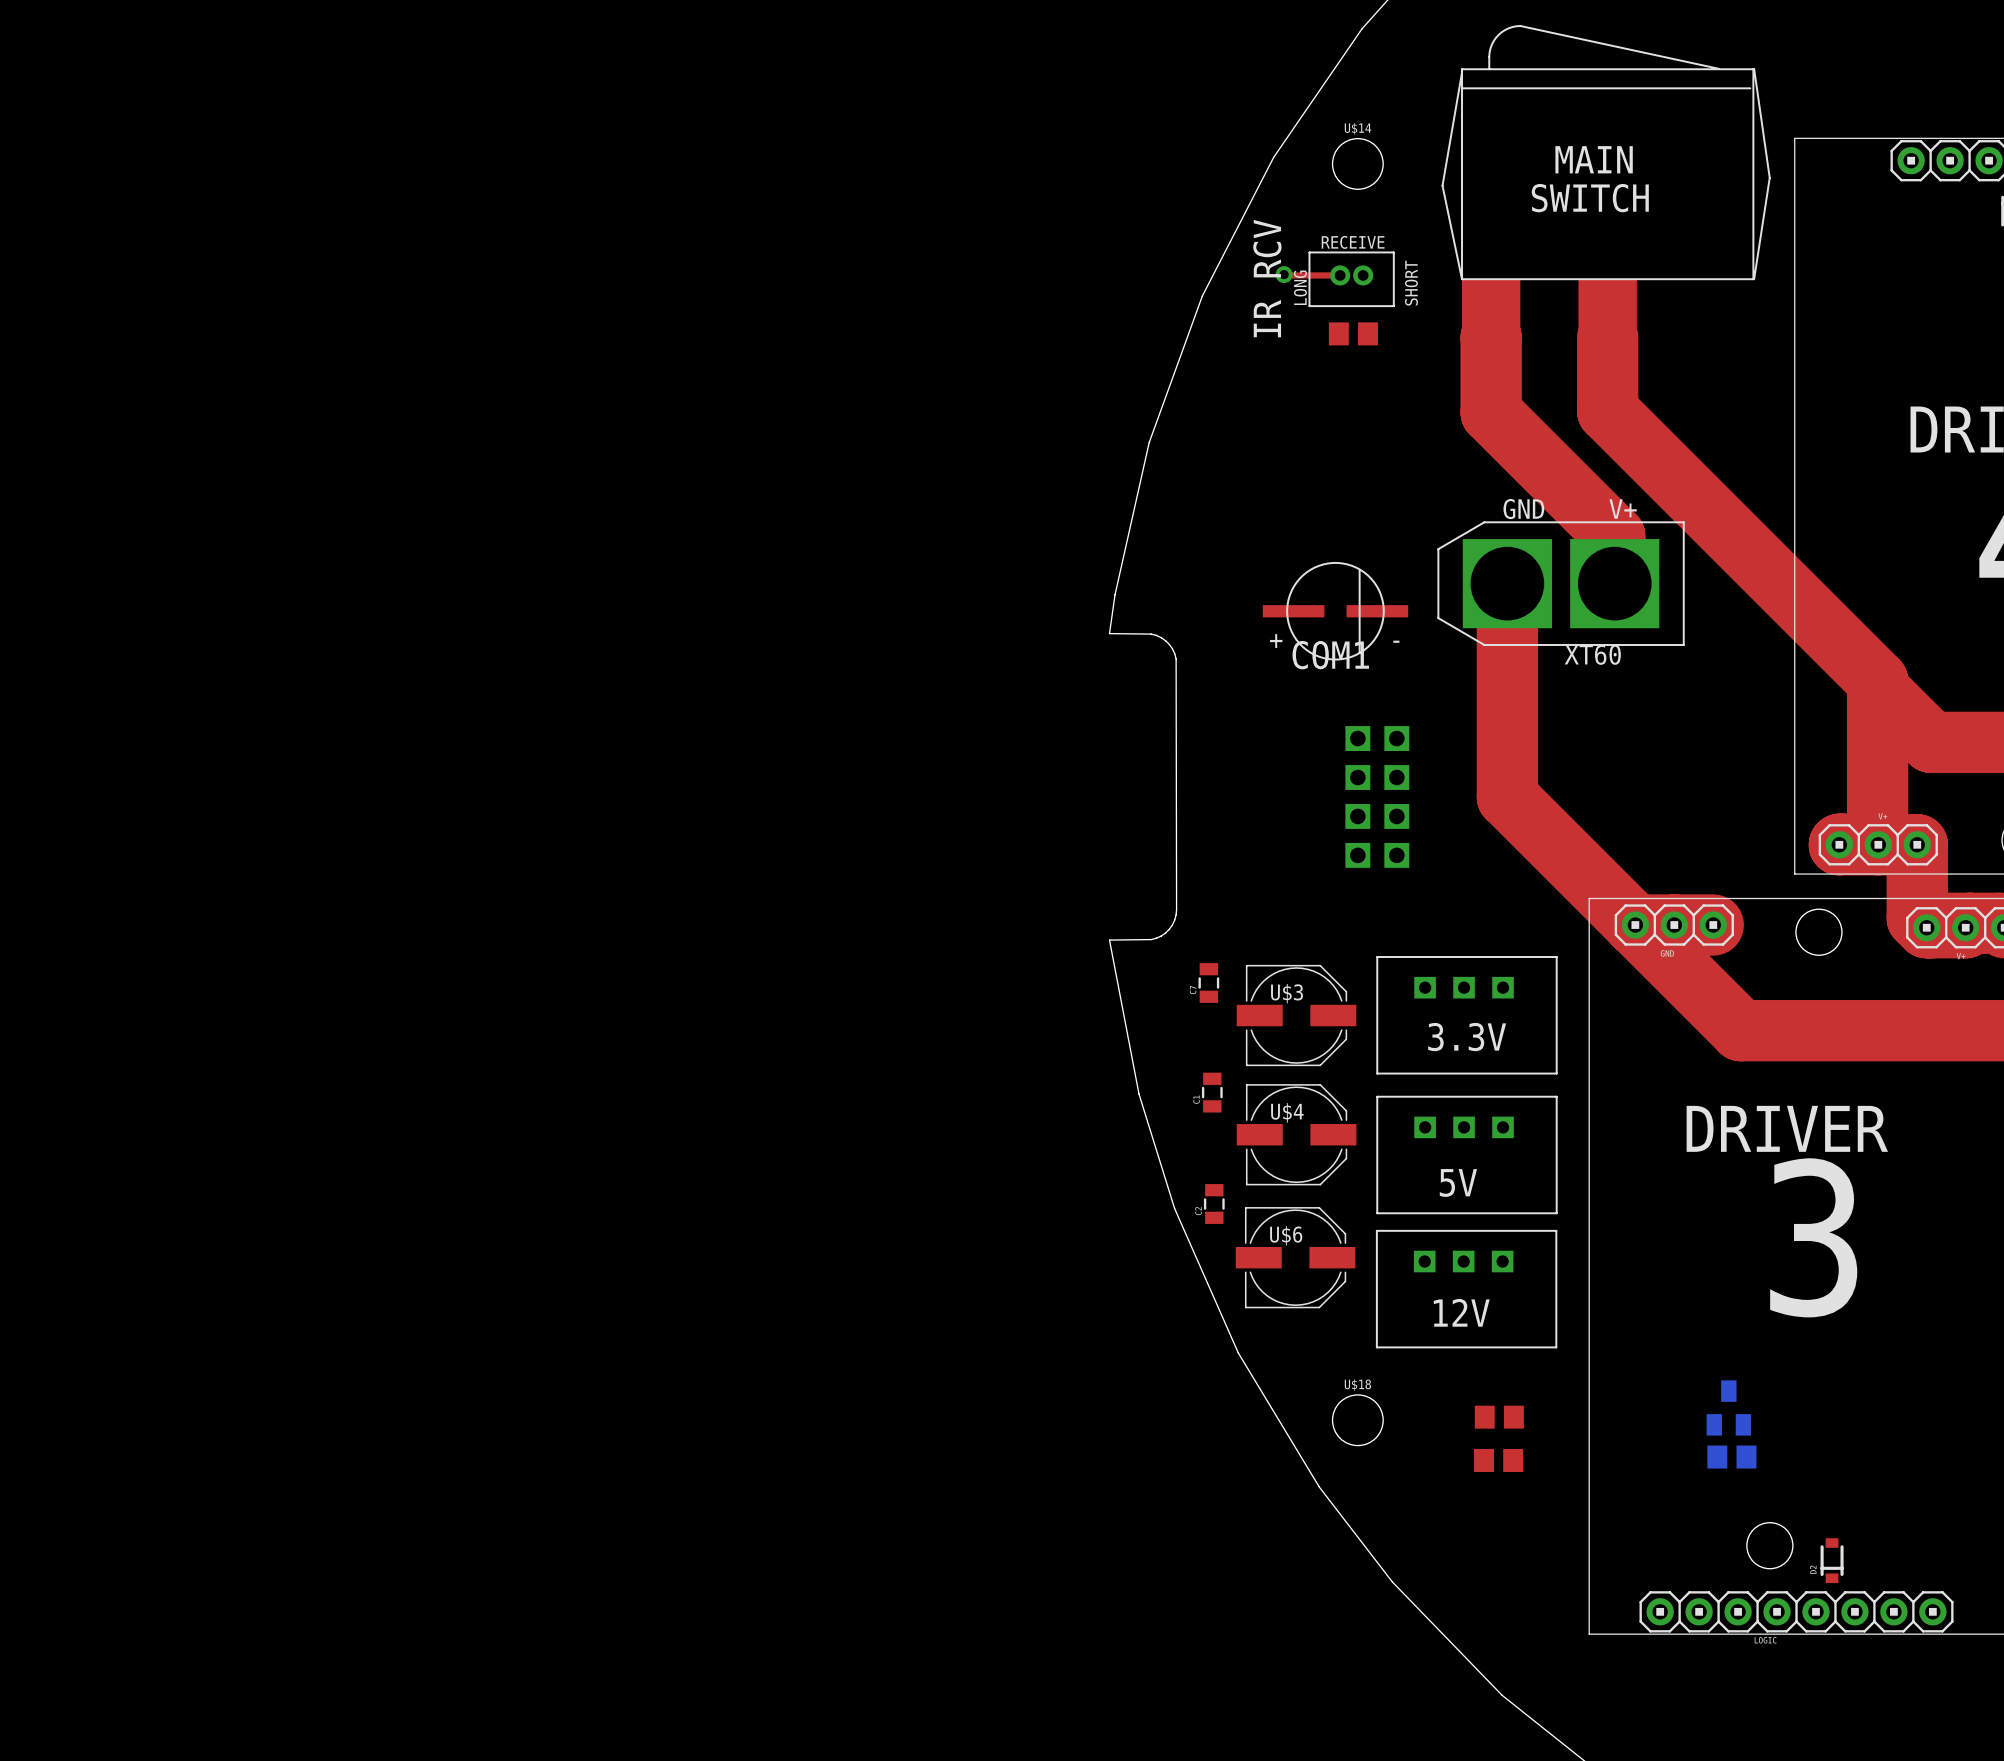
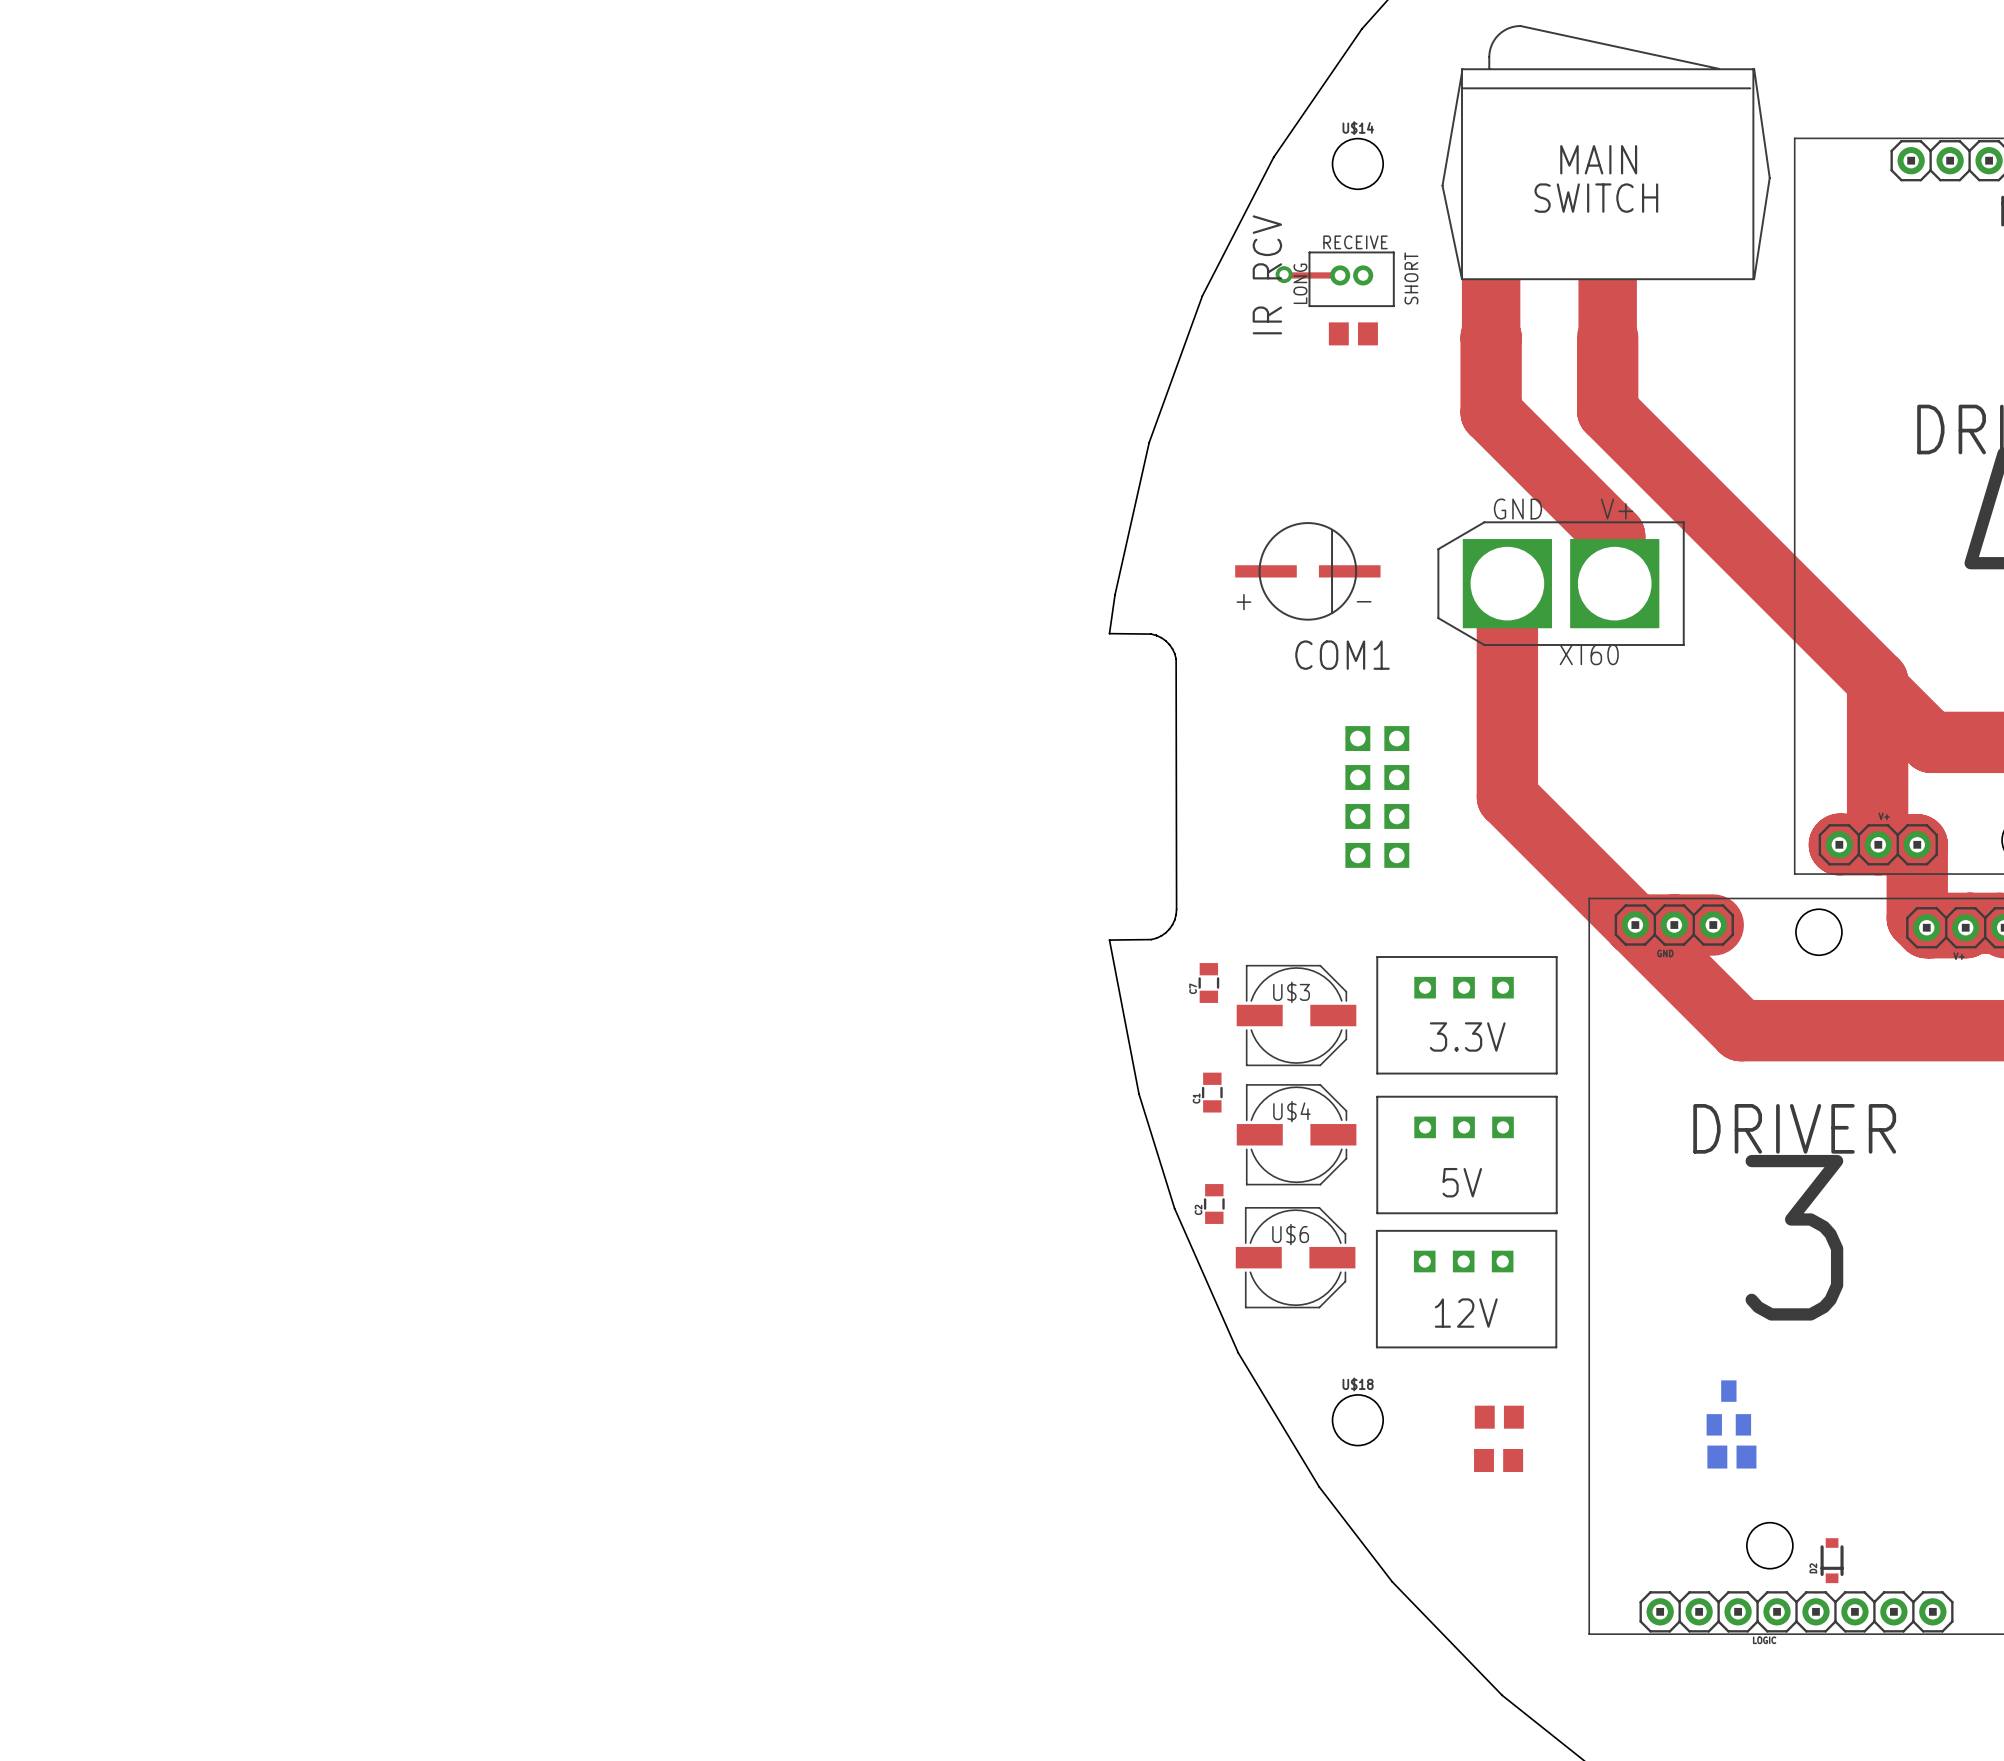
part position: (1335, 611) -> (1307, 571)

